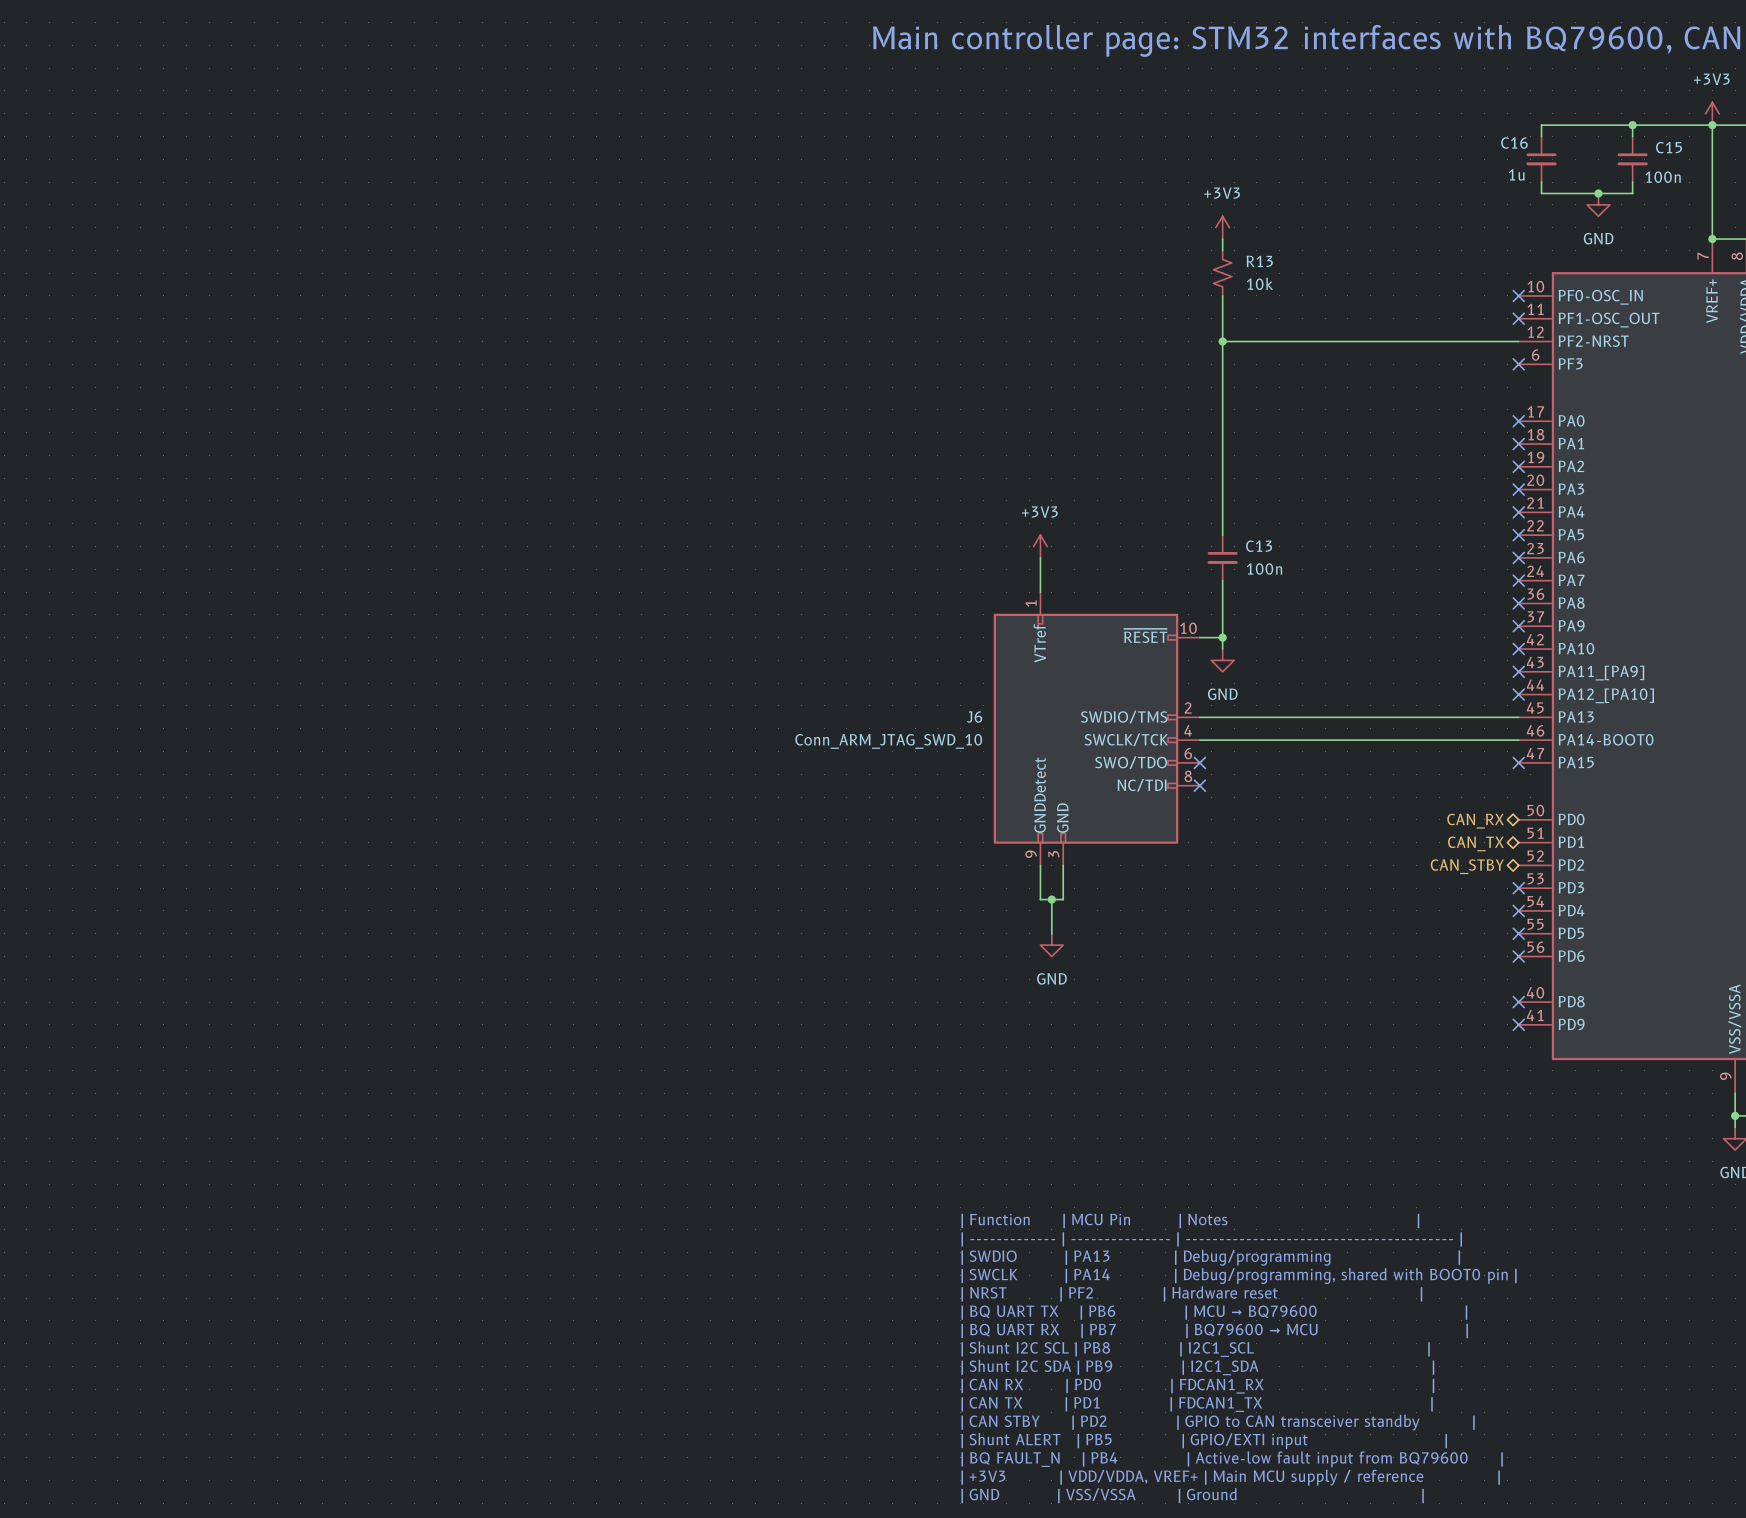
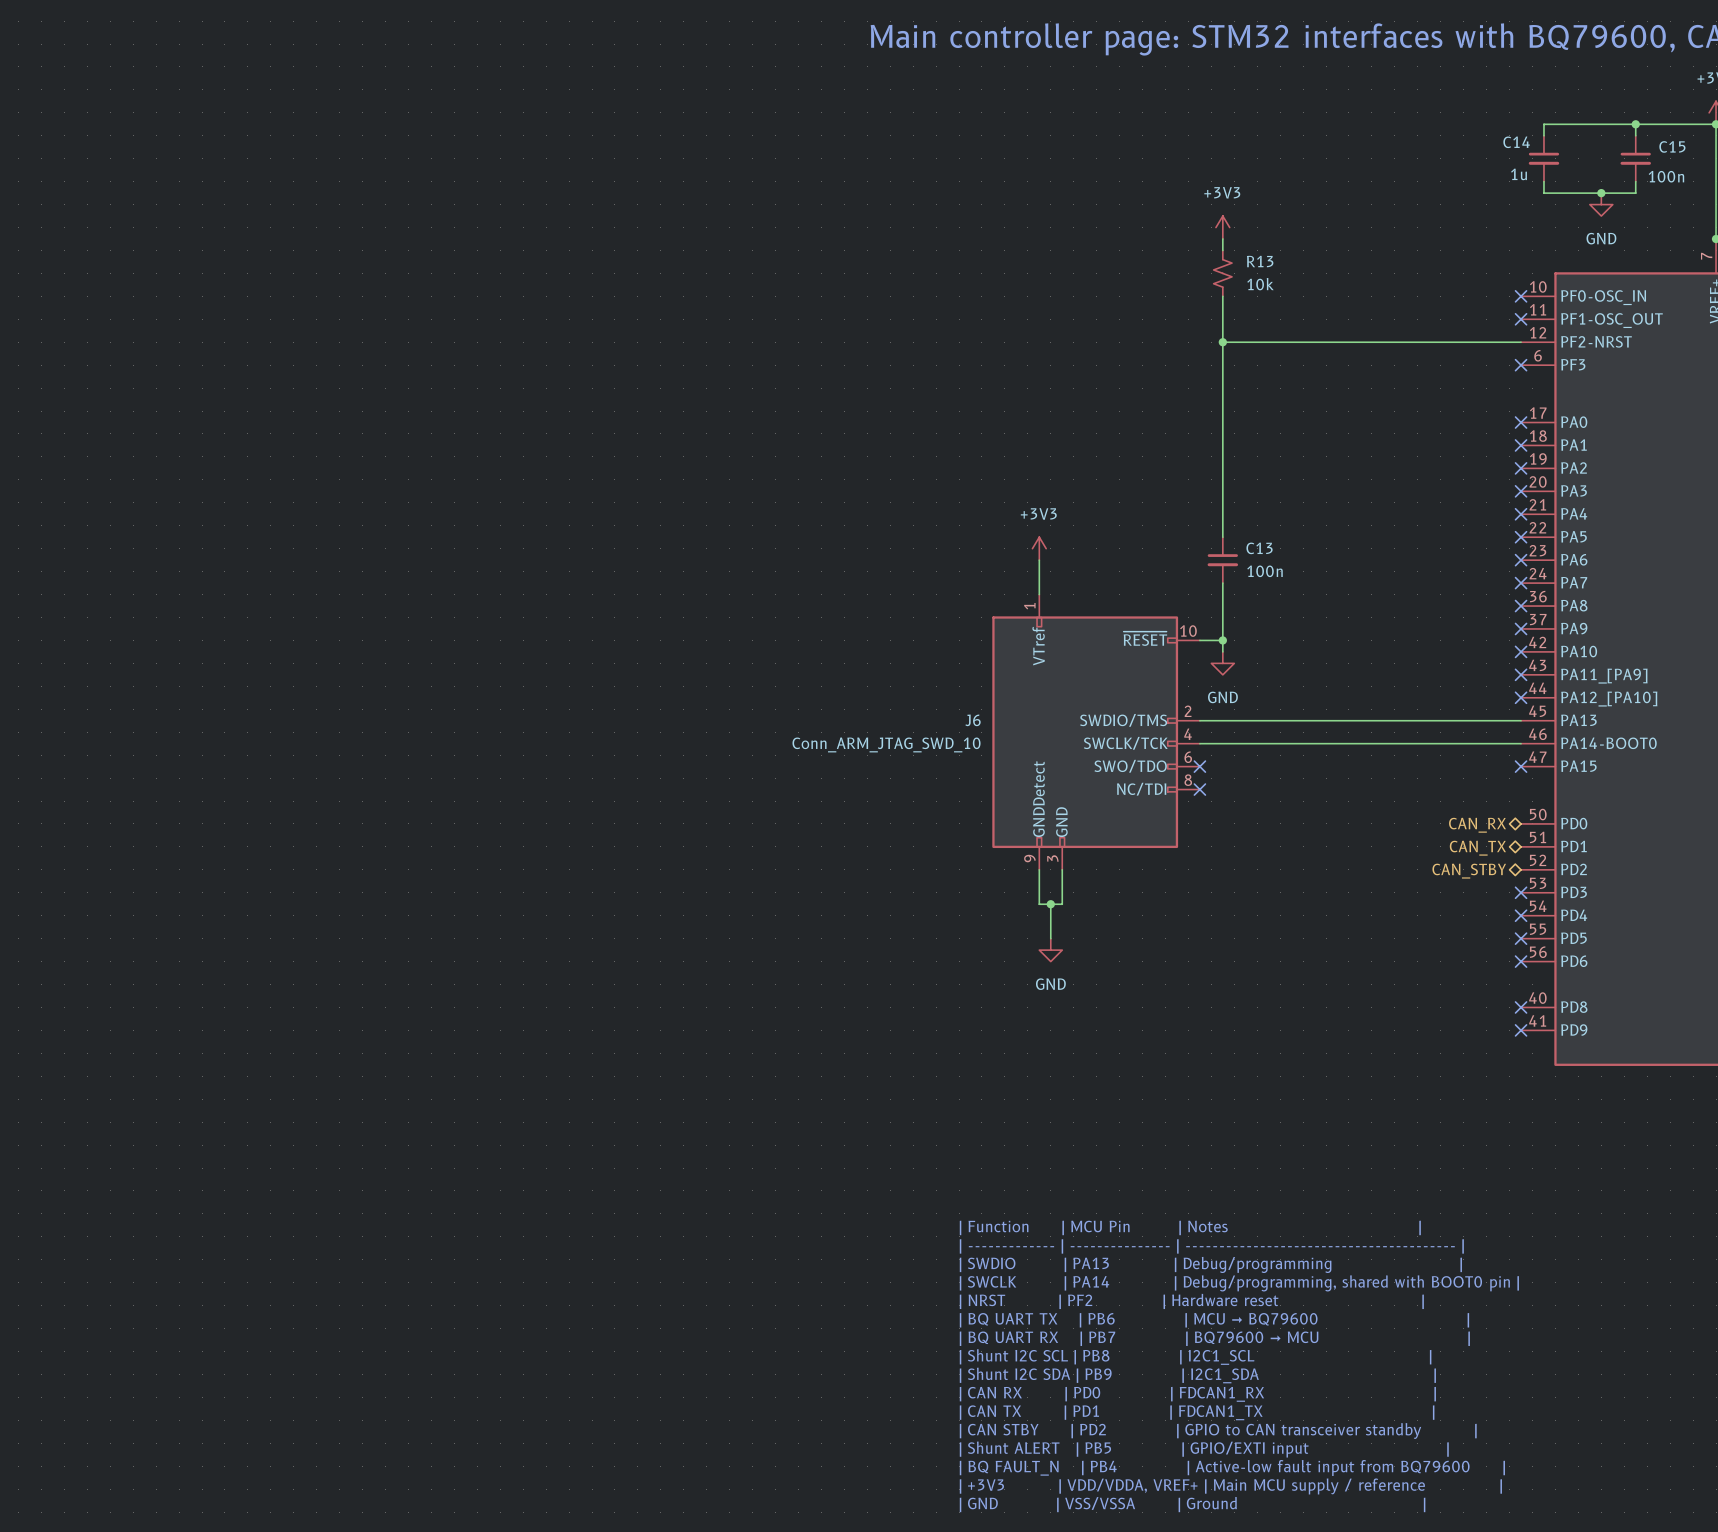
C16 name: C16 (1514, 143) -> C14 (1516, 142)

